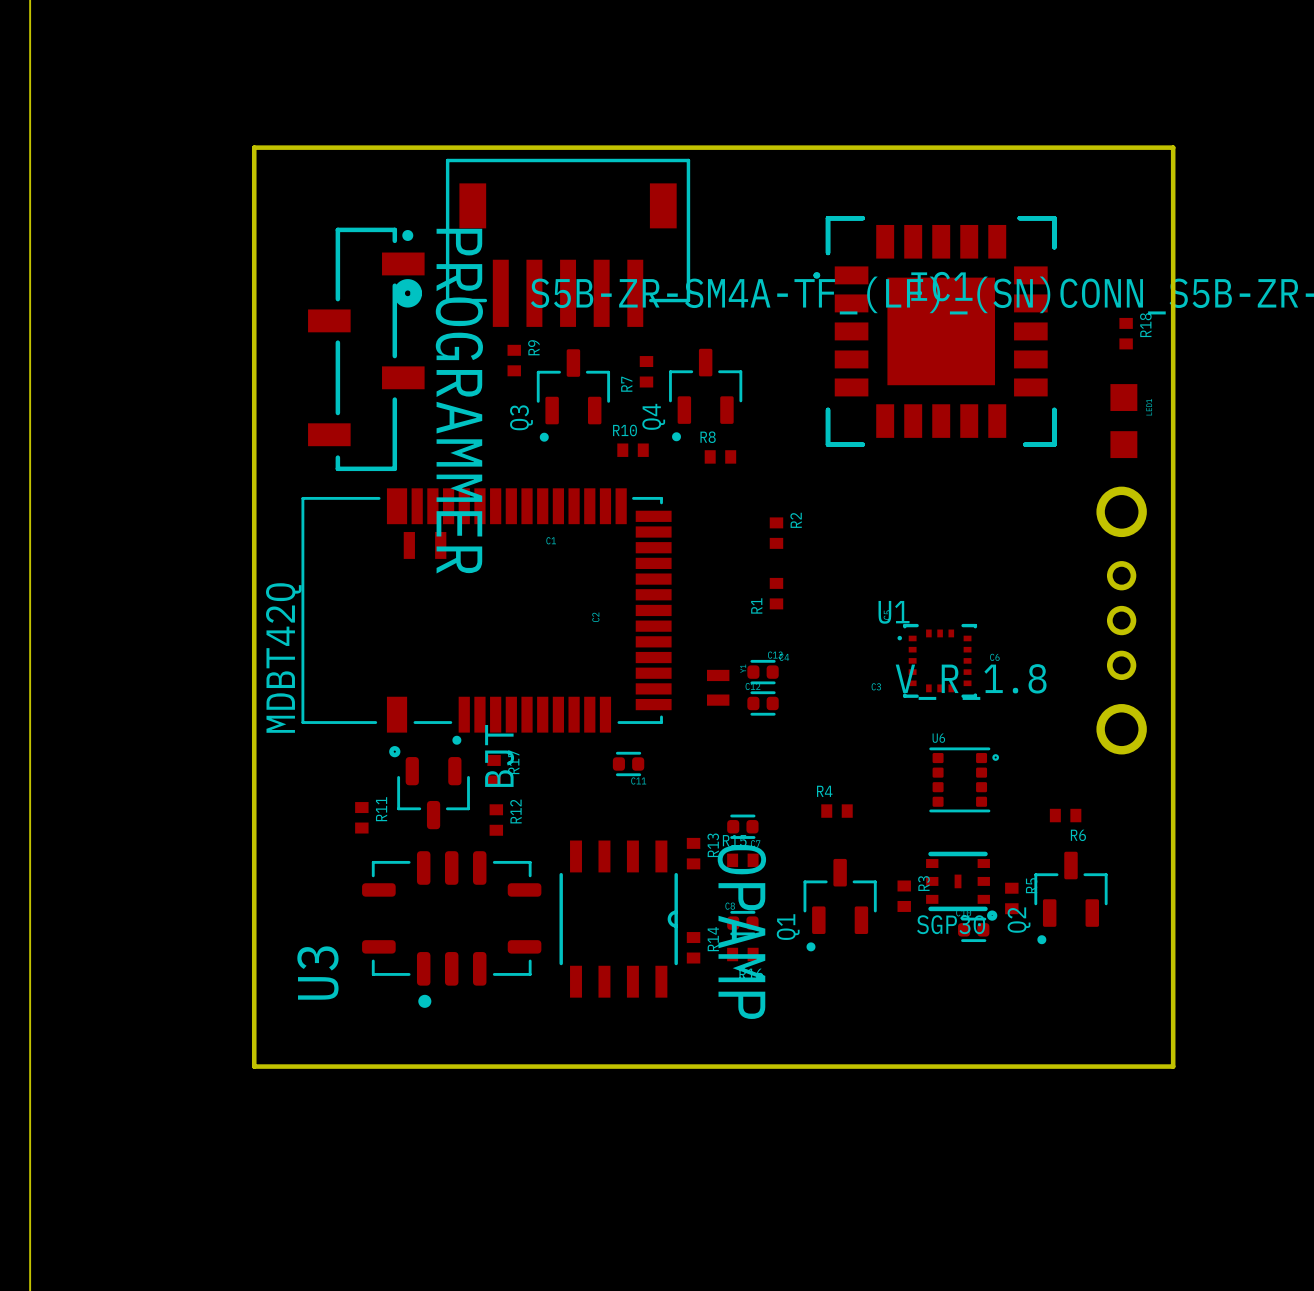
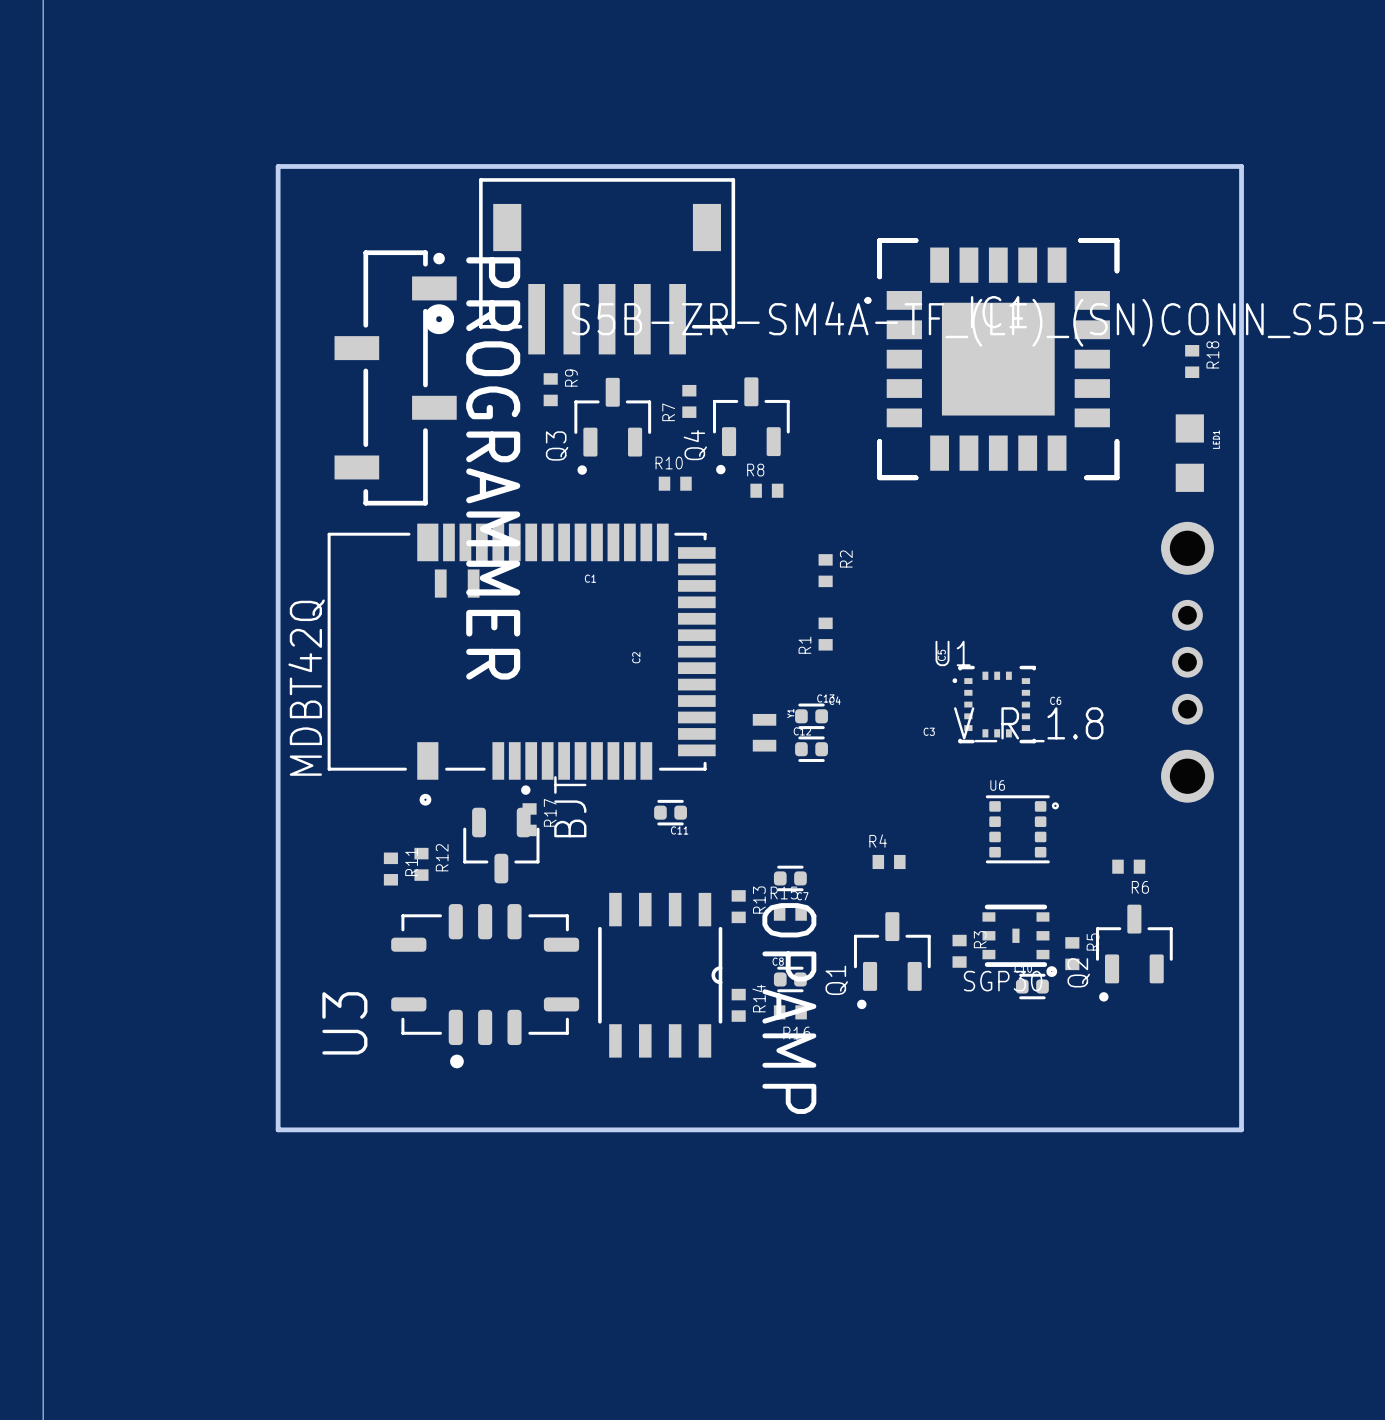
BJT position: (433, 782) -> (501, 834)
R12 position: (496, 820) -> (421, 864)

